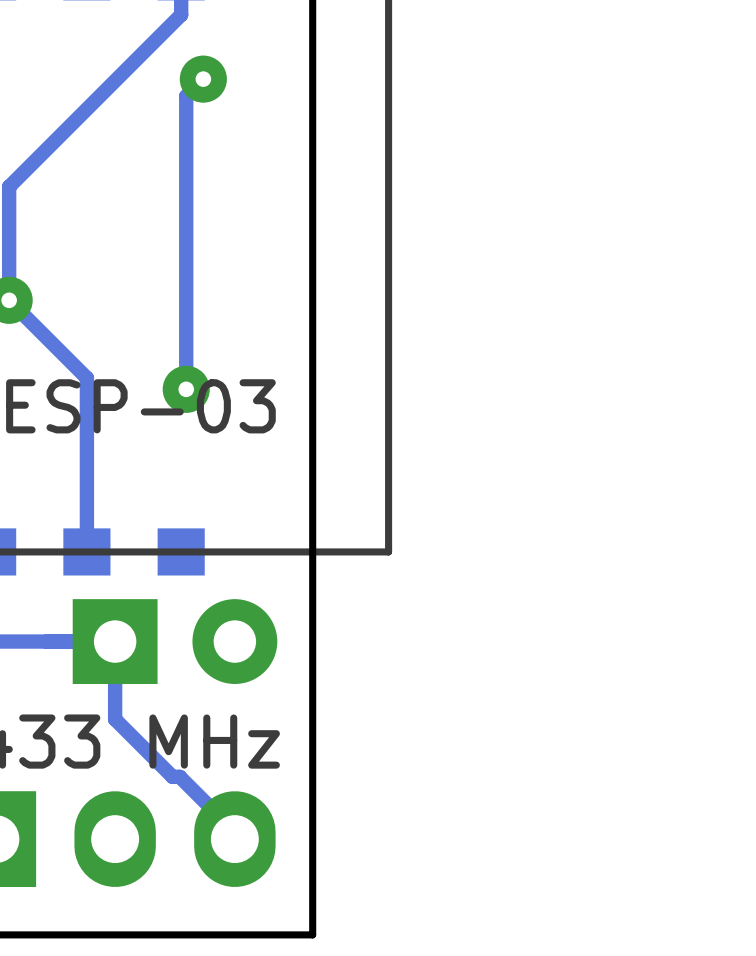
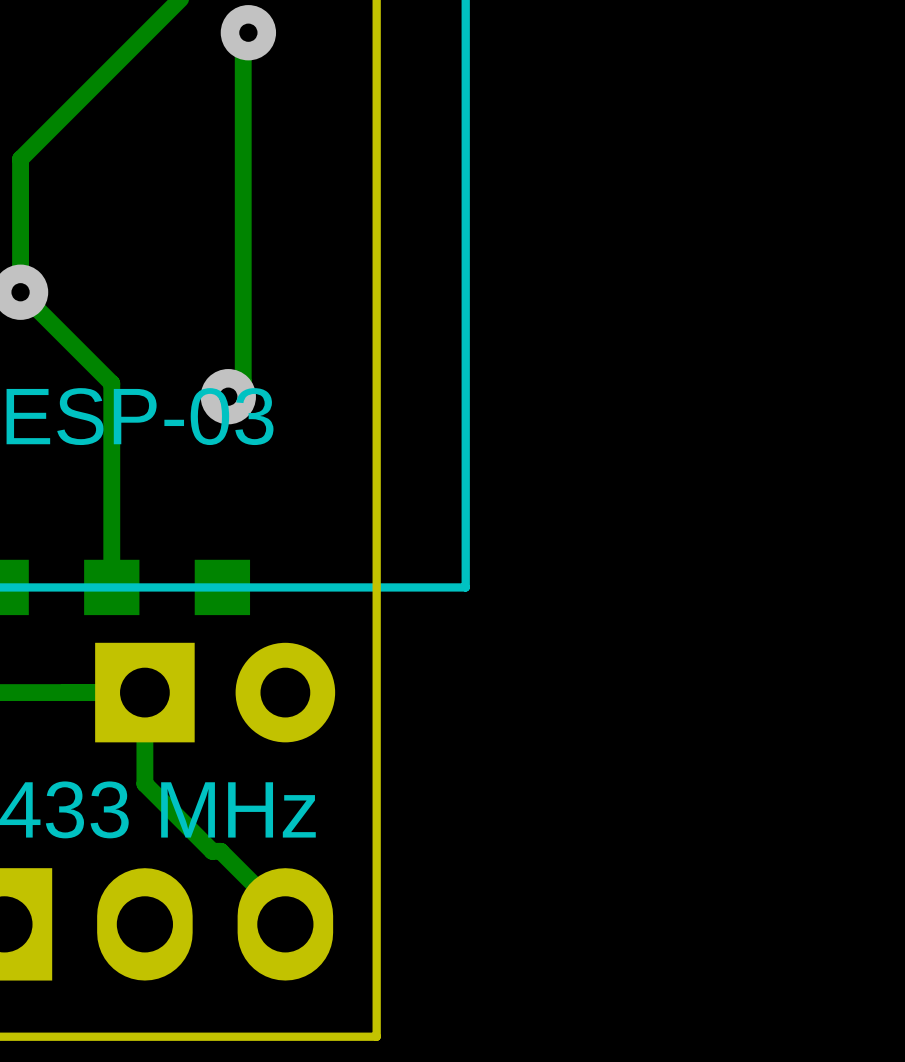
track: (203, 79) (186, 96) (186, 389) -> (243, 32) (243, 381) (228, 396)

